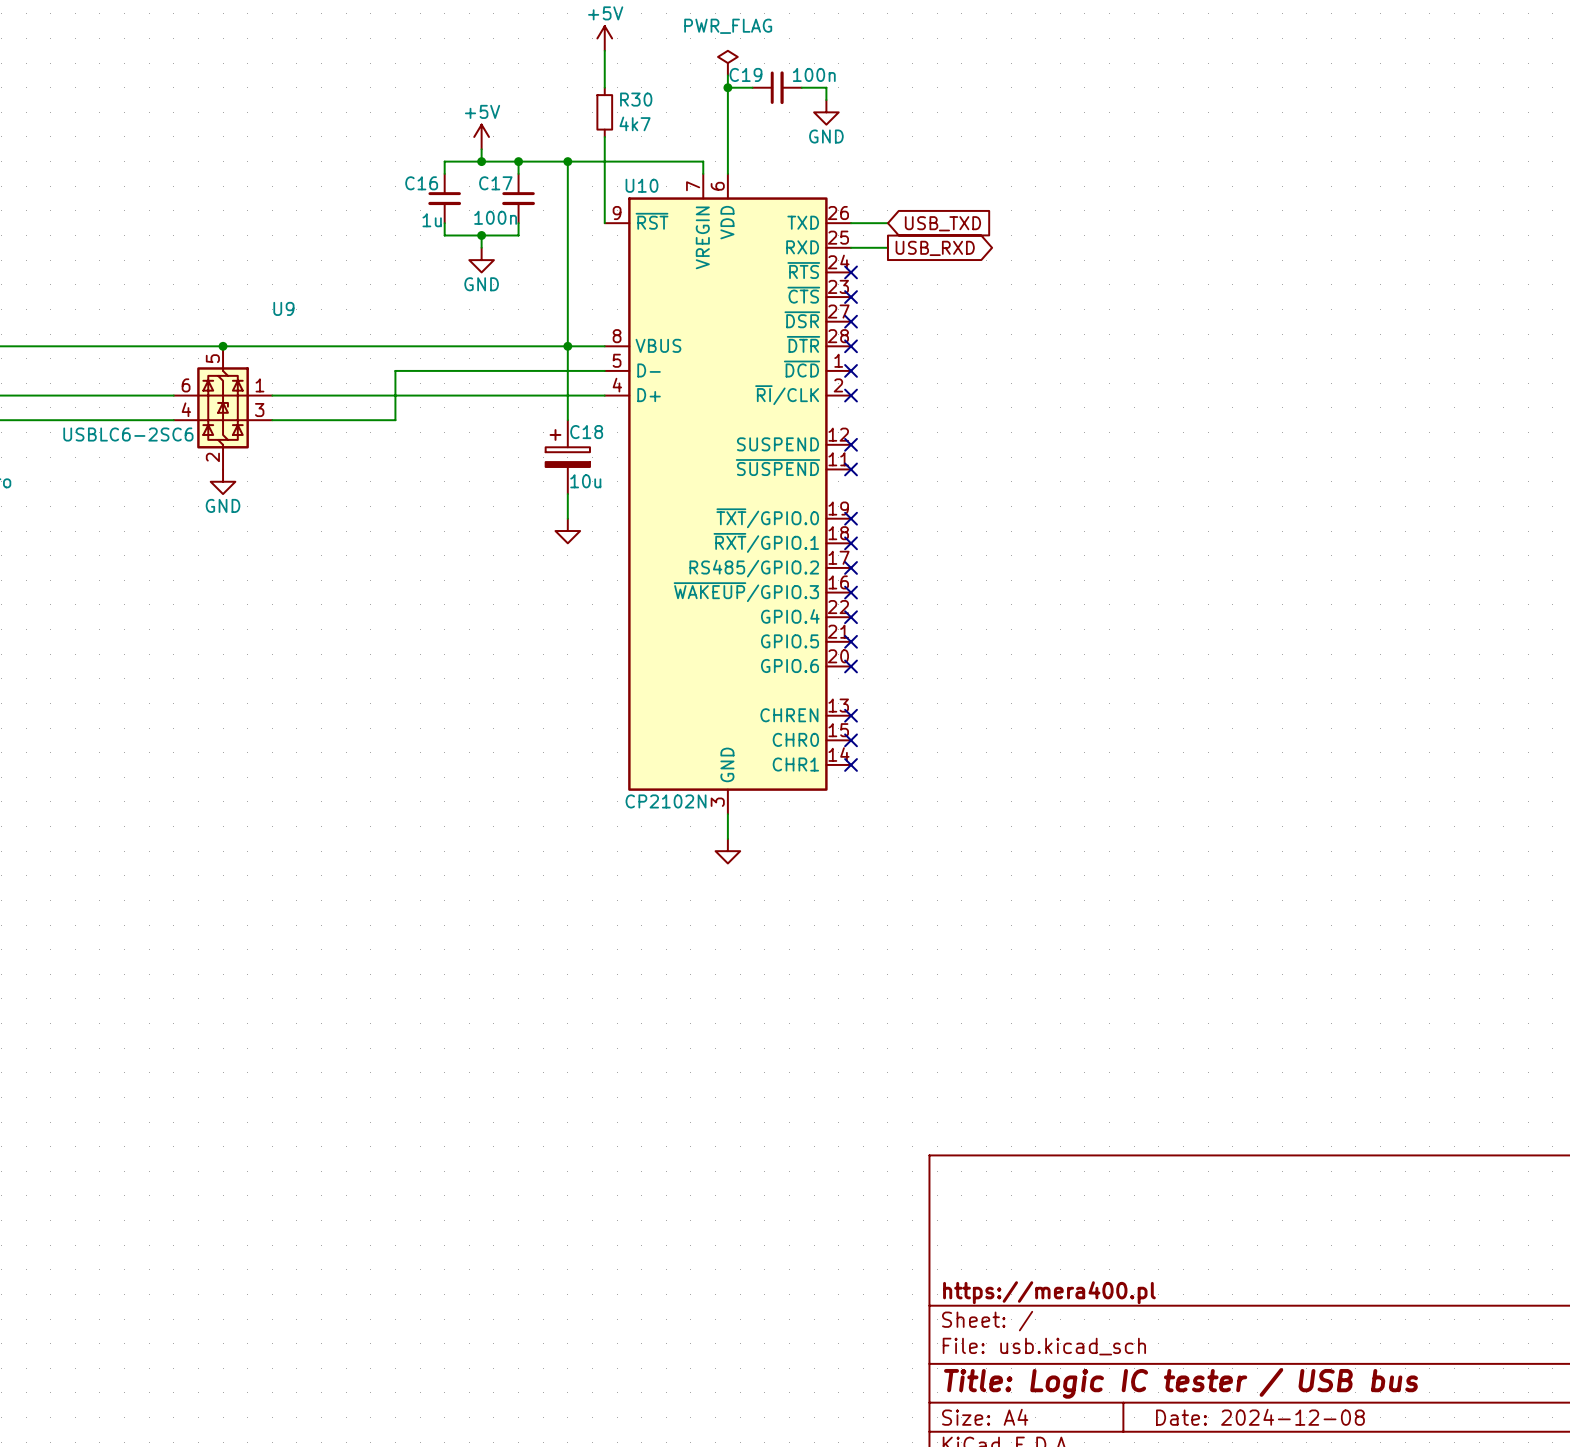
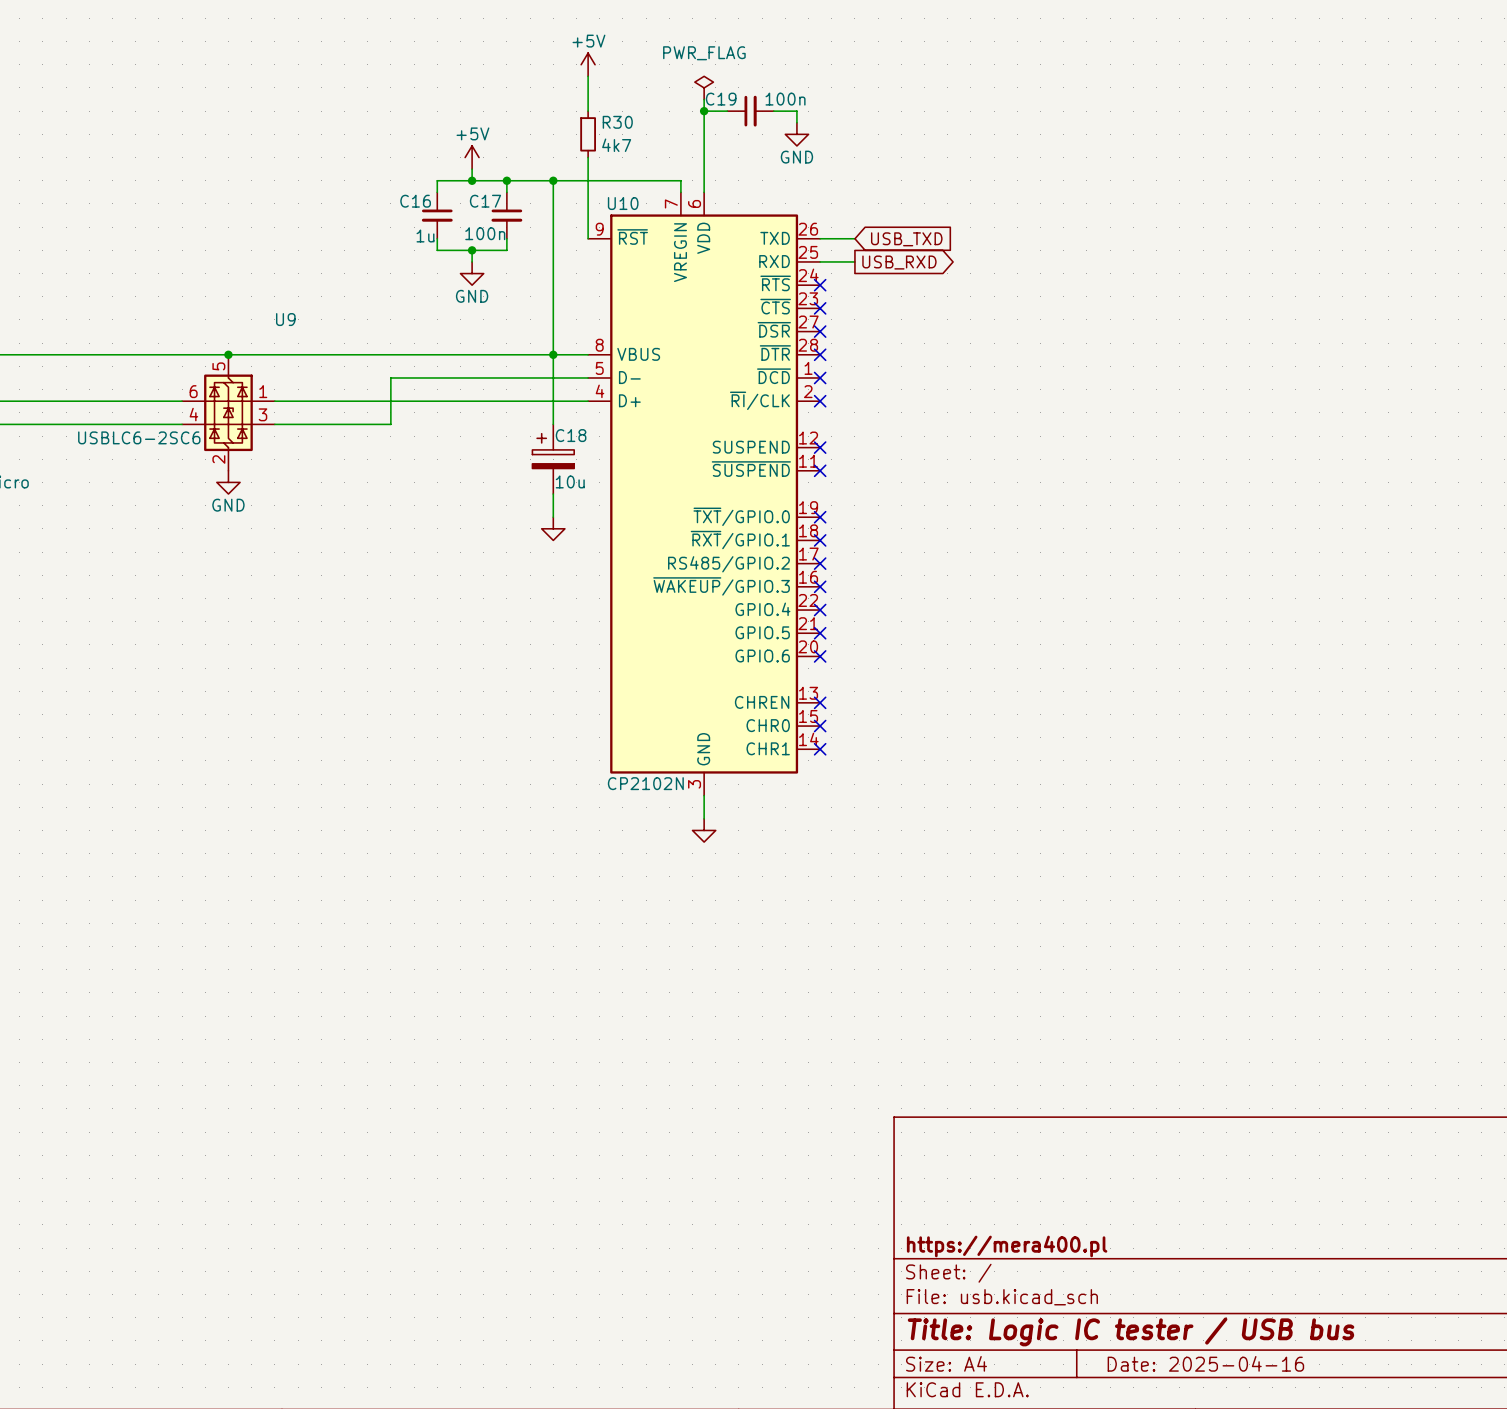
title block: Date: 2024-12-08 (1260, 1417) -> Date: 2025-04-16 (1205, 1363)

